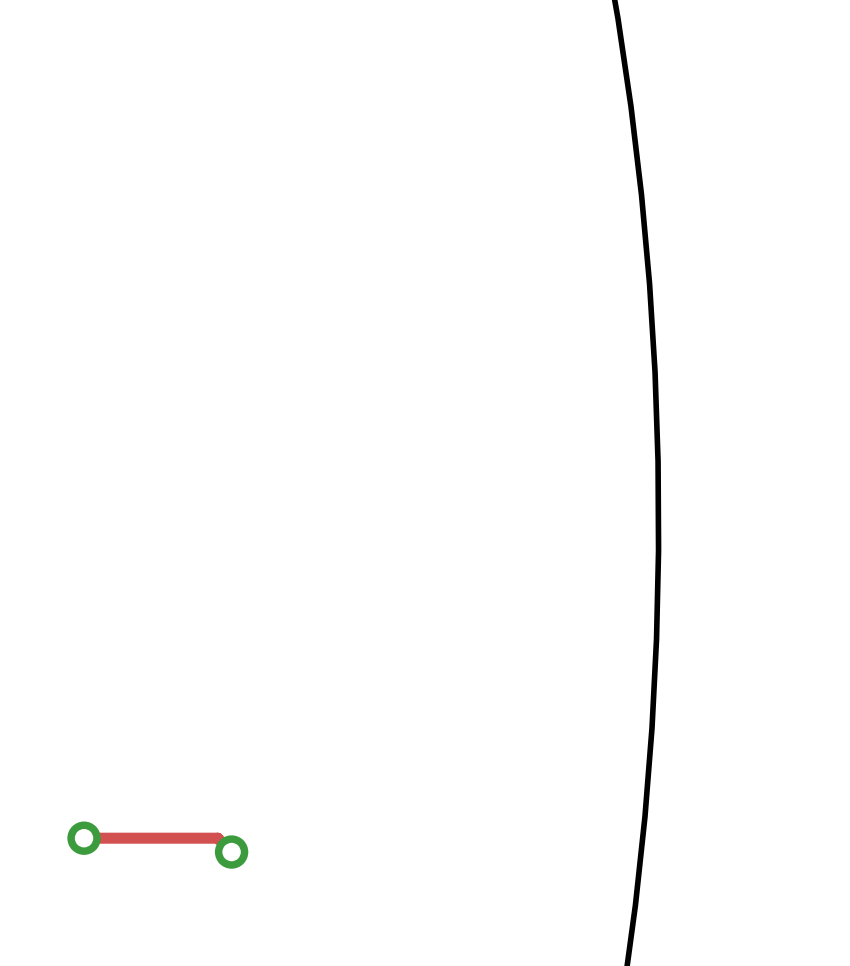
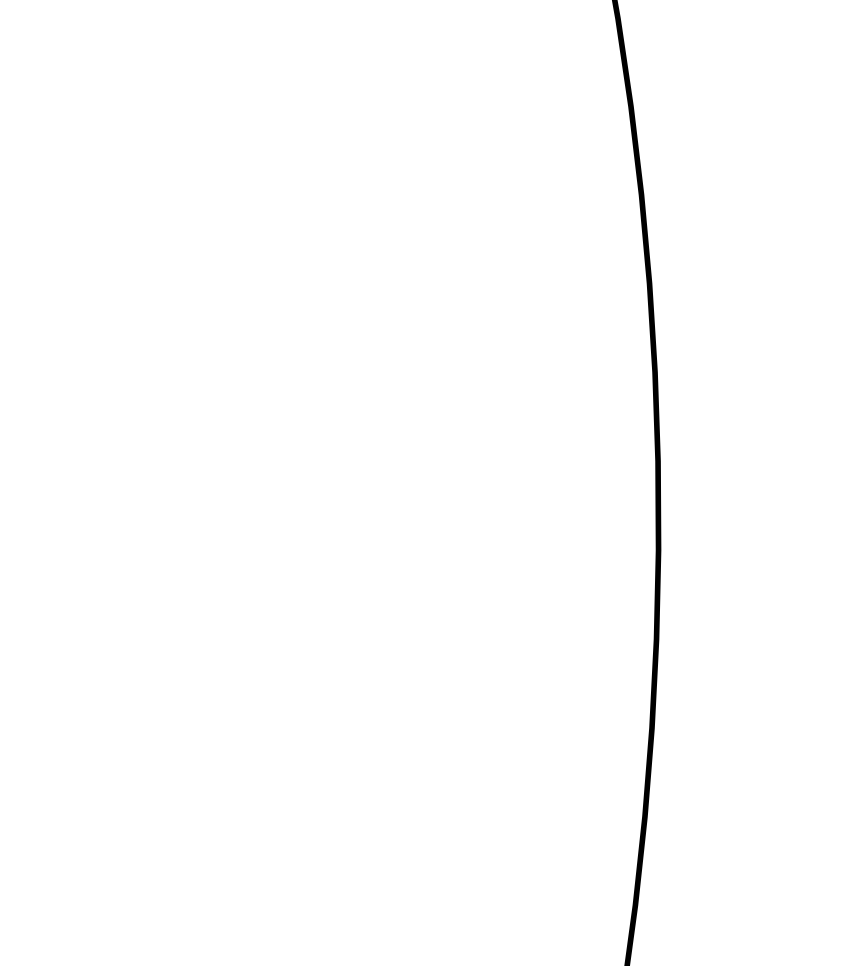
track: (84, 838) (217, 838) (231, 852) -> none
via: (84, 838) -> none
via: (231, 852) -> none

